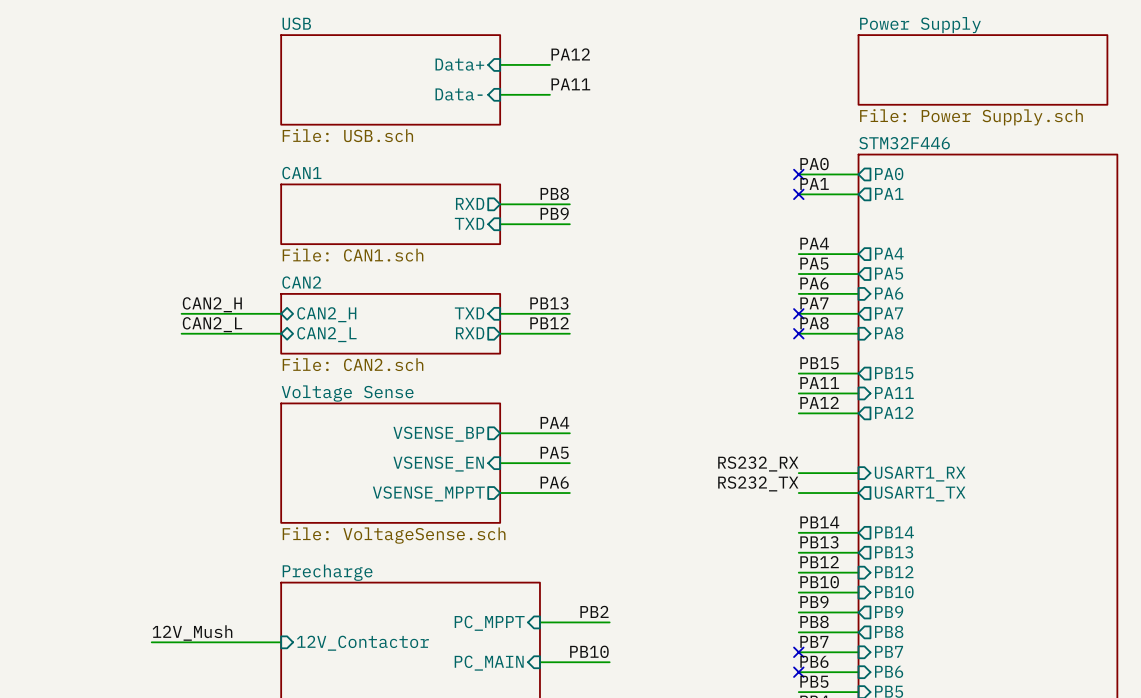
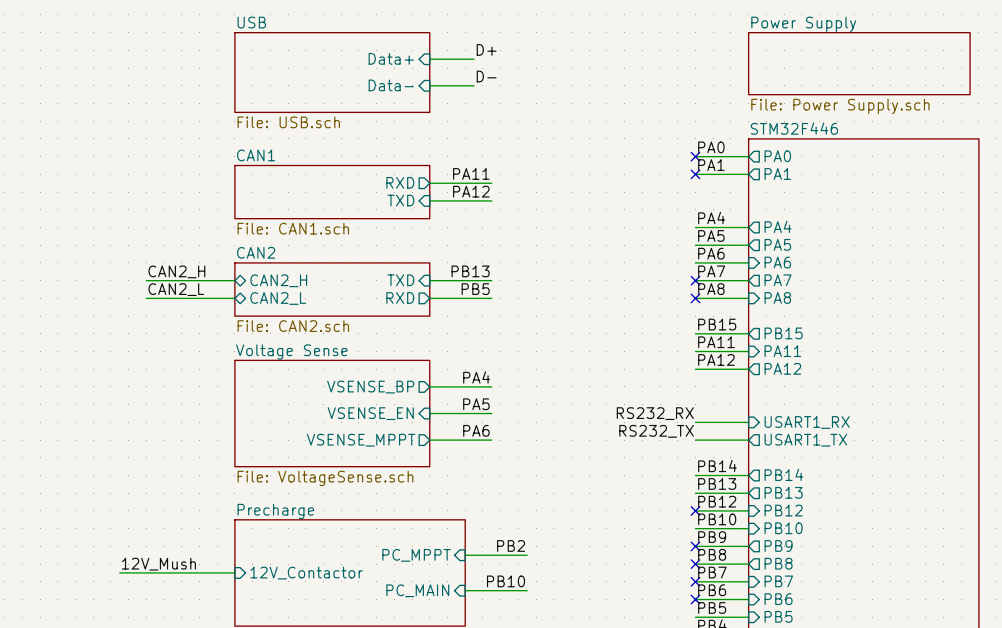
label: PA12 (570, 54) -> D+ (486, 49)
label: PA11 (570, 84) -> D- (486, 76)
label: PB8 (554, 193) -> PA11 (471, 173)
label: PB9 (554, 213) -> PA12 (471, 191)
label: PB12 (549, 323) -> PB5 (475, 289)
no-connect mark: none -> (695, 510)
no-connect mark: none -> (695, 546)
no-connect mark: none -> (695, 564)

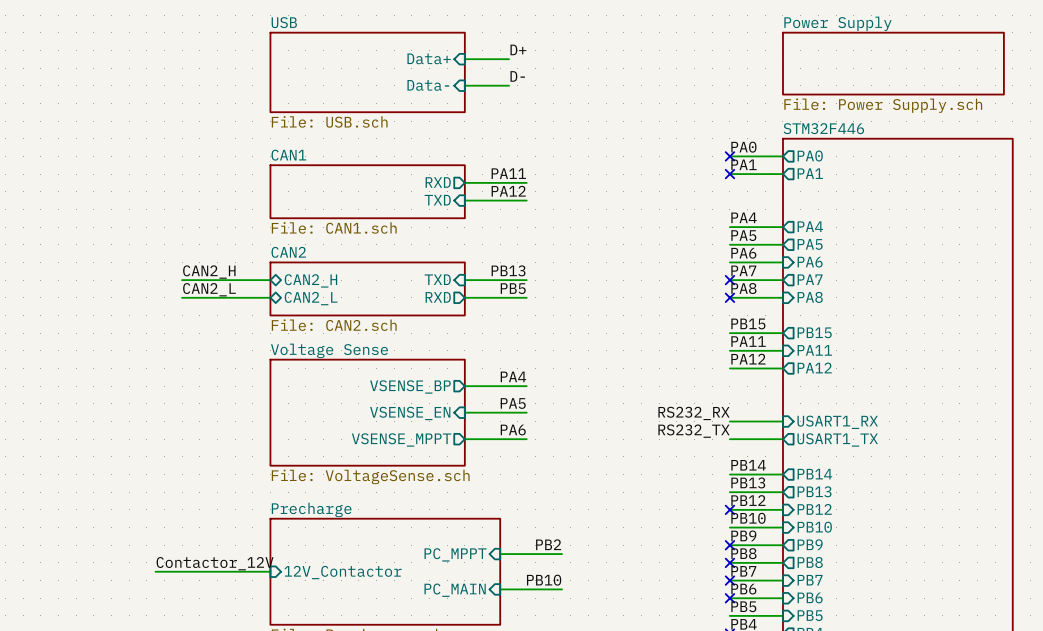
label: 12V_Mush (158, 564) -> Contactor_12V (215, 563)

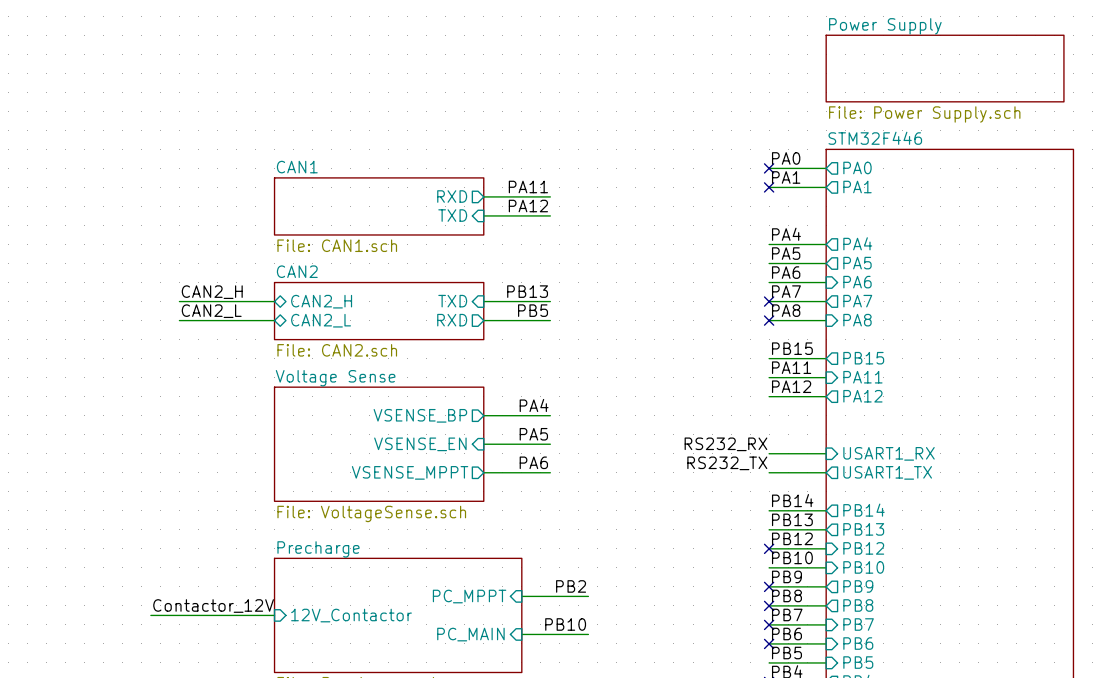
label: D+ (518, 49) -> none
sheet pin: Data+ (429, 58) -> none
wire: (464, 59) (509, 59) -> none
sheet USB: File: USB.sch (367, 72) -> none
label: D- (517, 76) -> none
sheet pin: Data- (428, 85) -> none
wire: (464, 85) (509, 85) -> none

